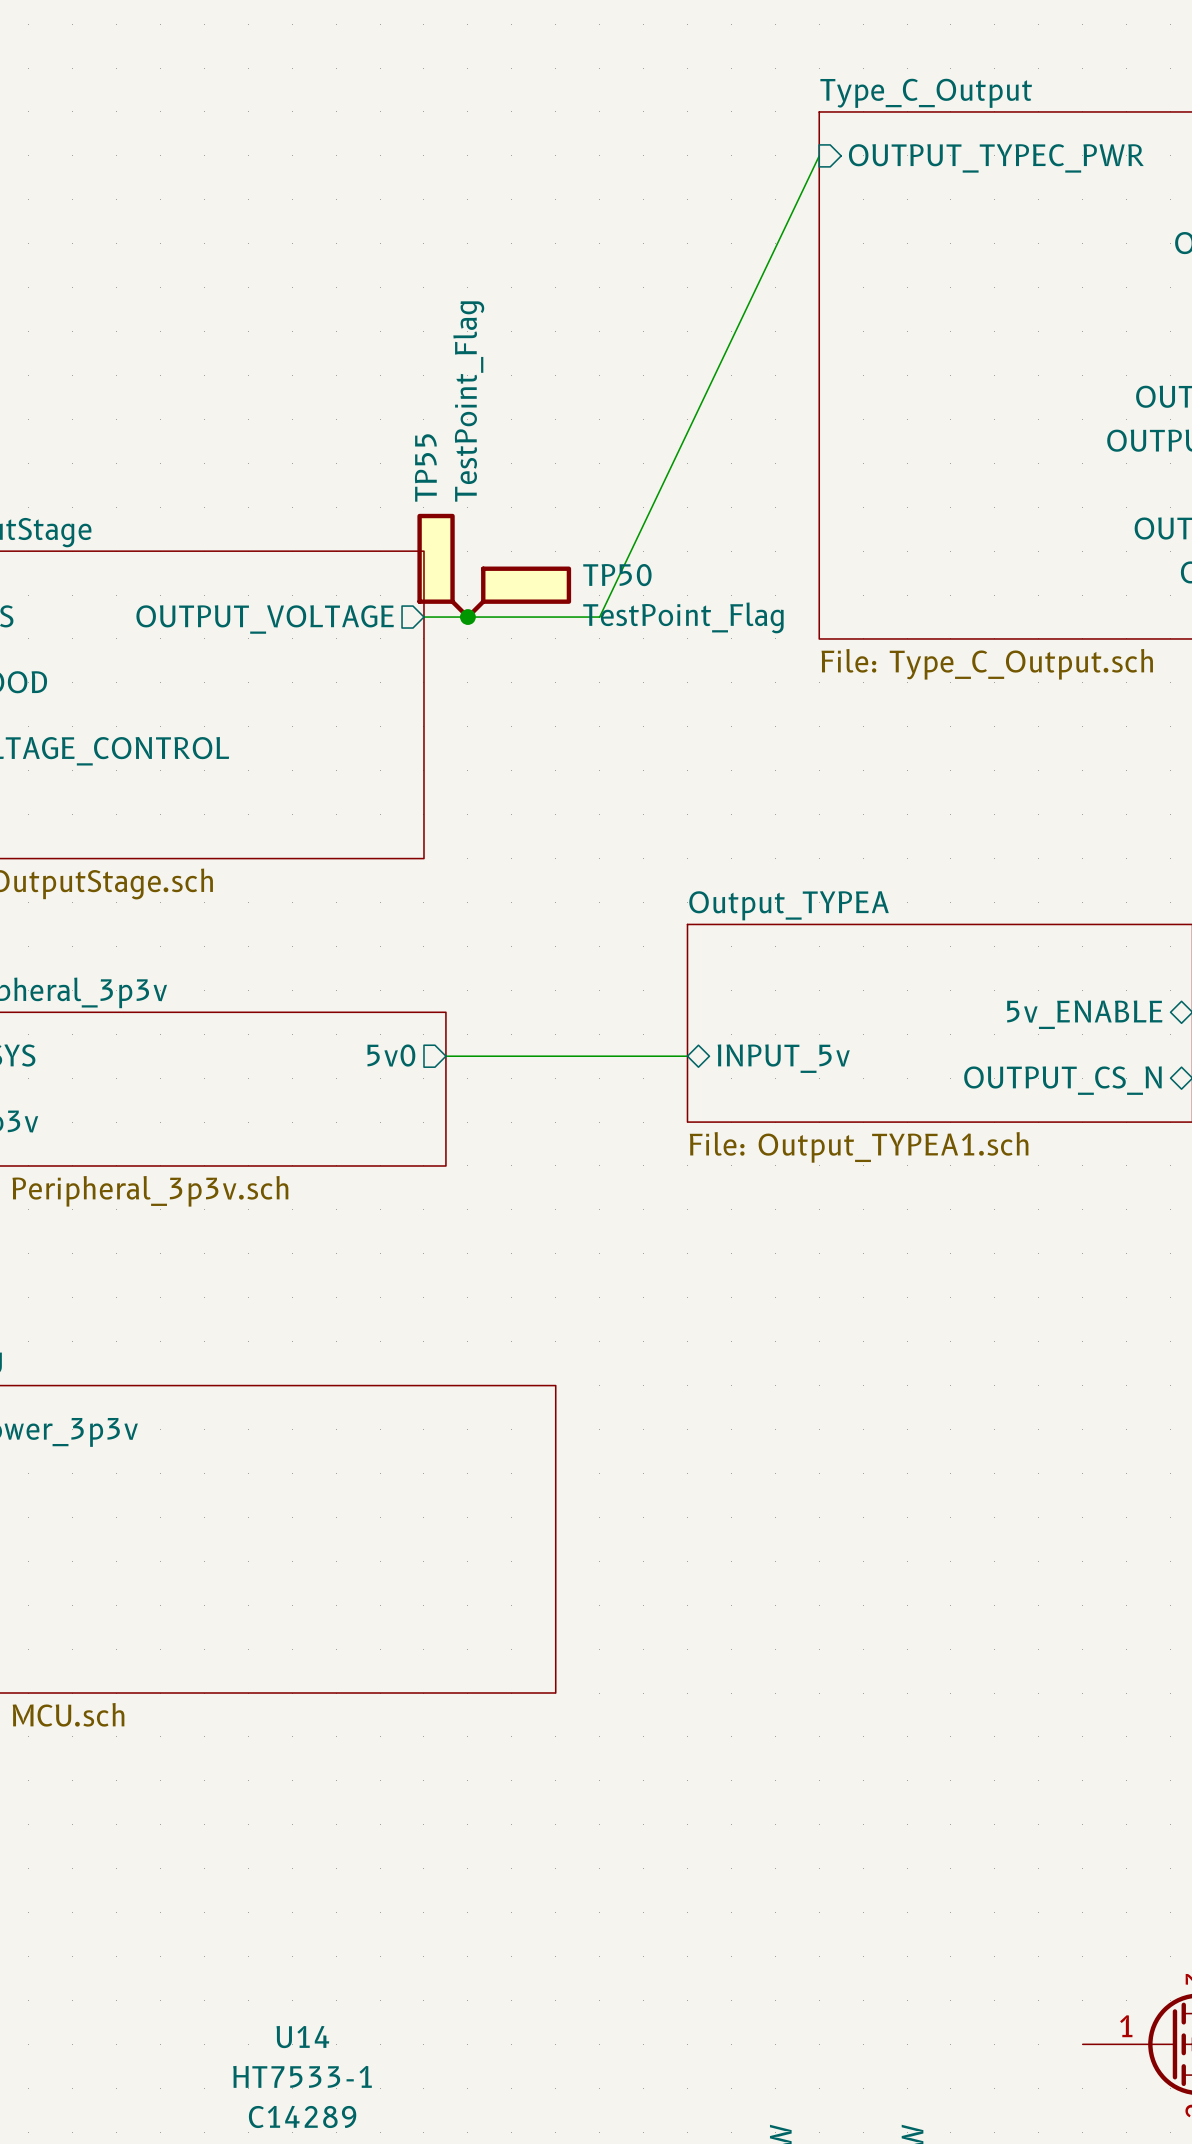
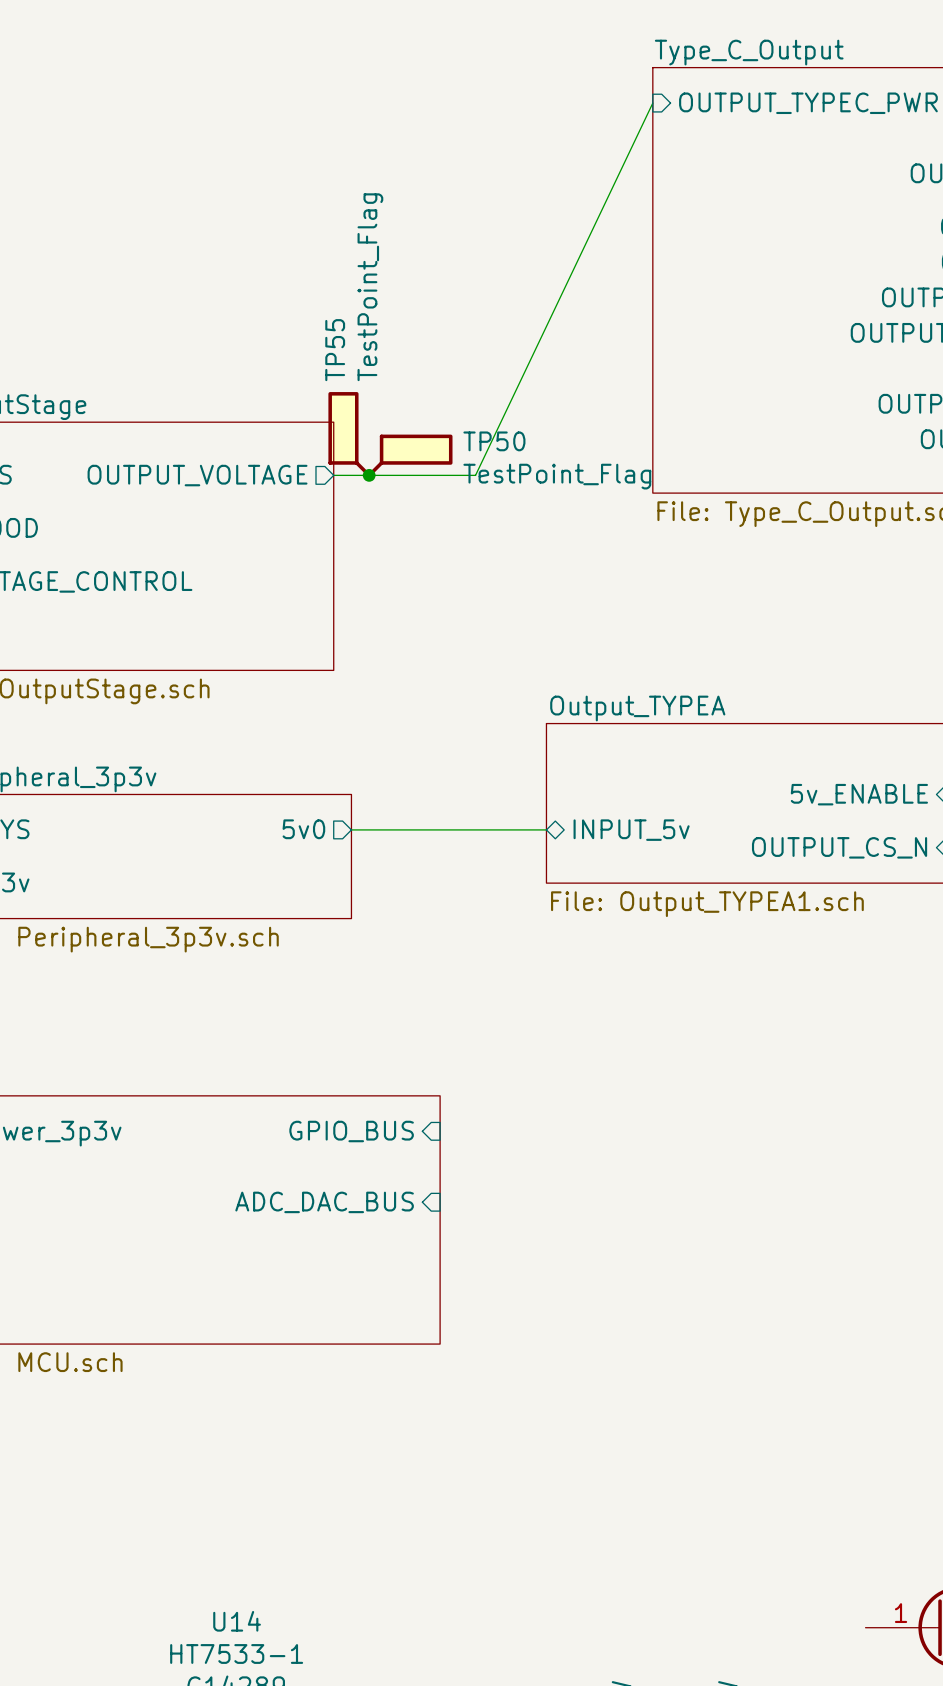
sheet pin: none -> GPIO_BUS (351, 1131)
sheet pin: none -> ADC_DAC_BUS (324, 1202)

